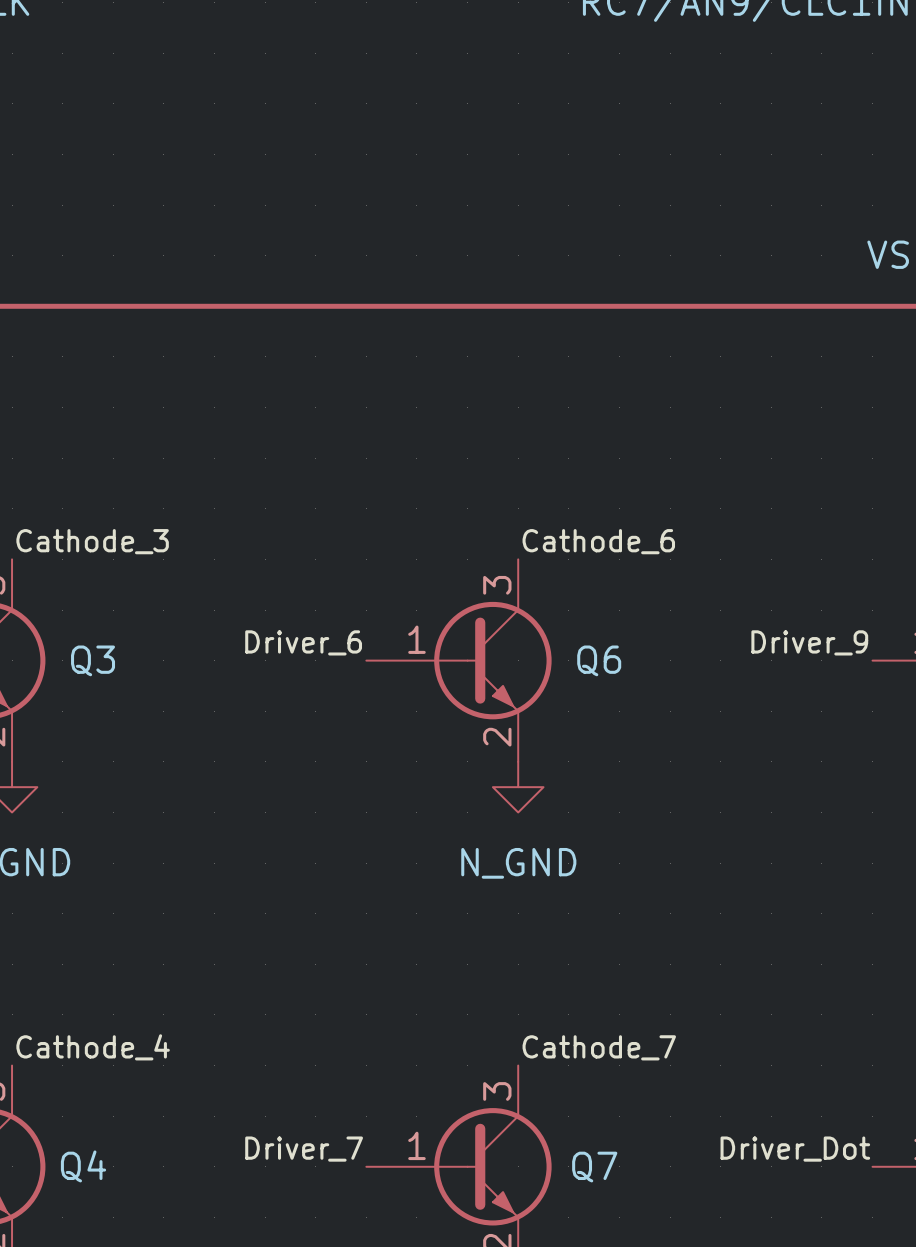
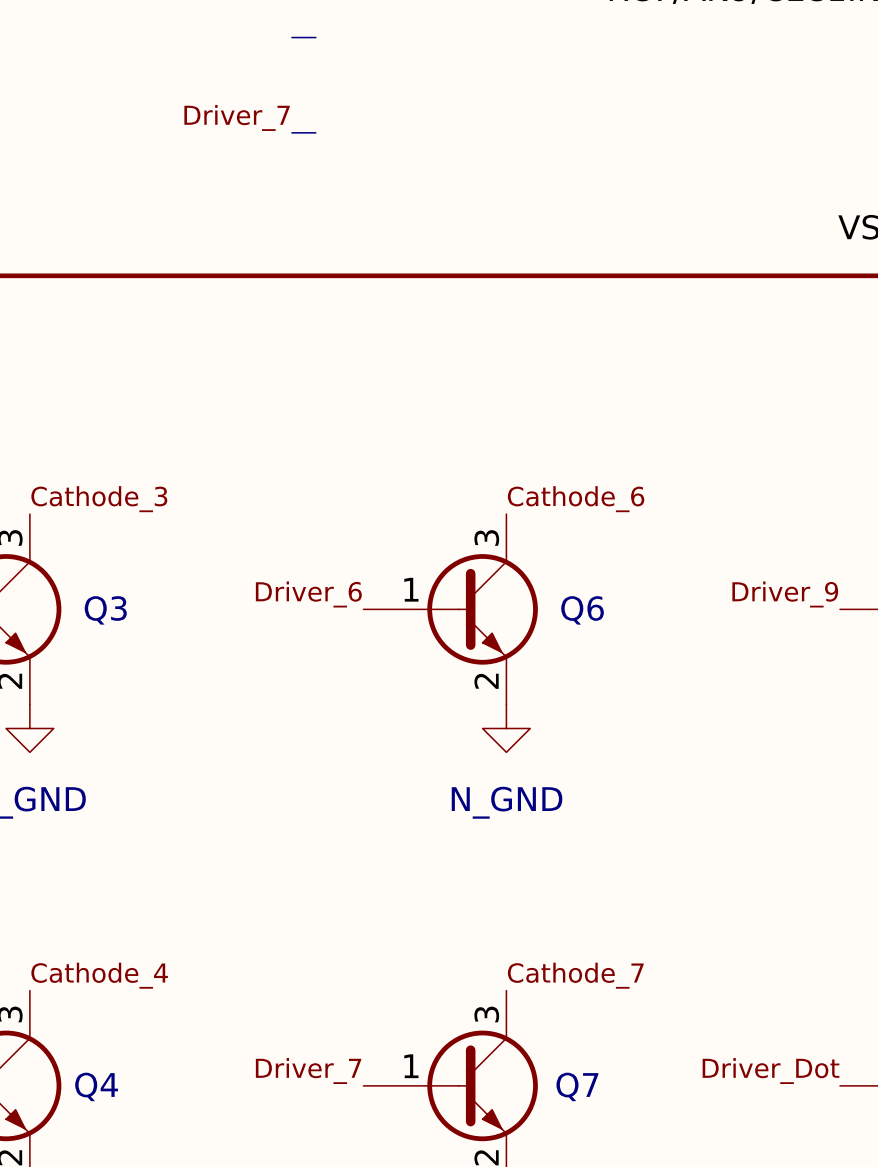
wire: none -> (291, 37) (315, 37)
label: none -> Driver_7 (237, 117)
wire: none -> (291, 132) (315, 132)

